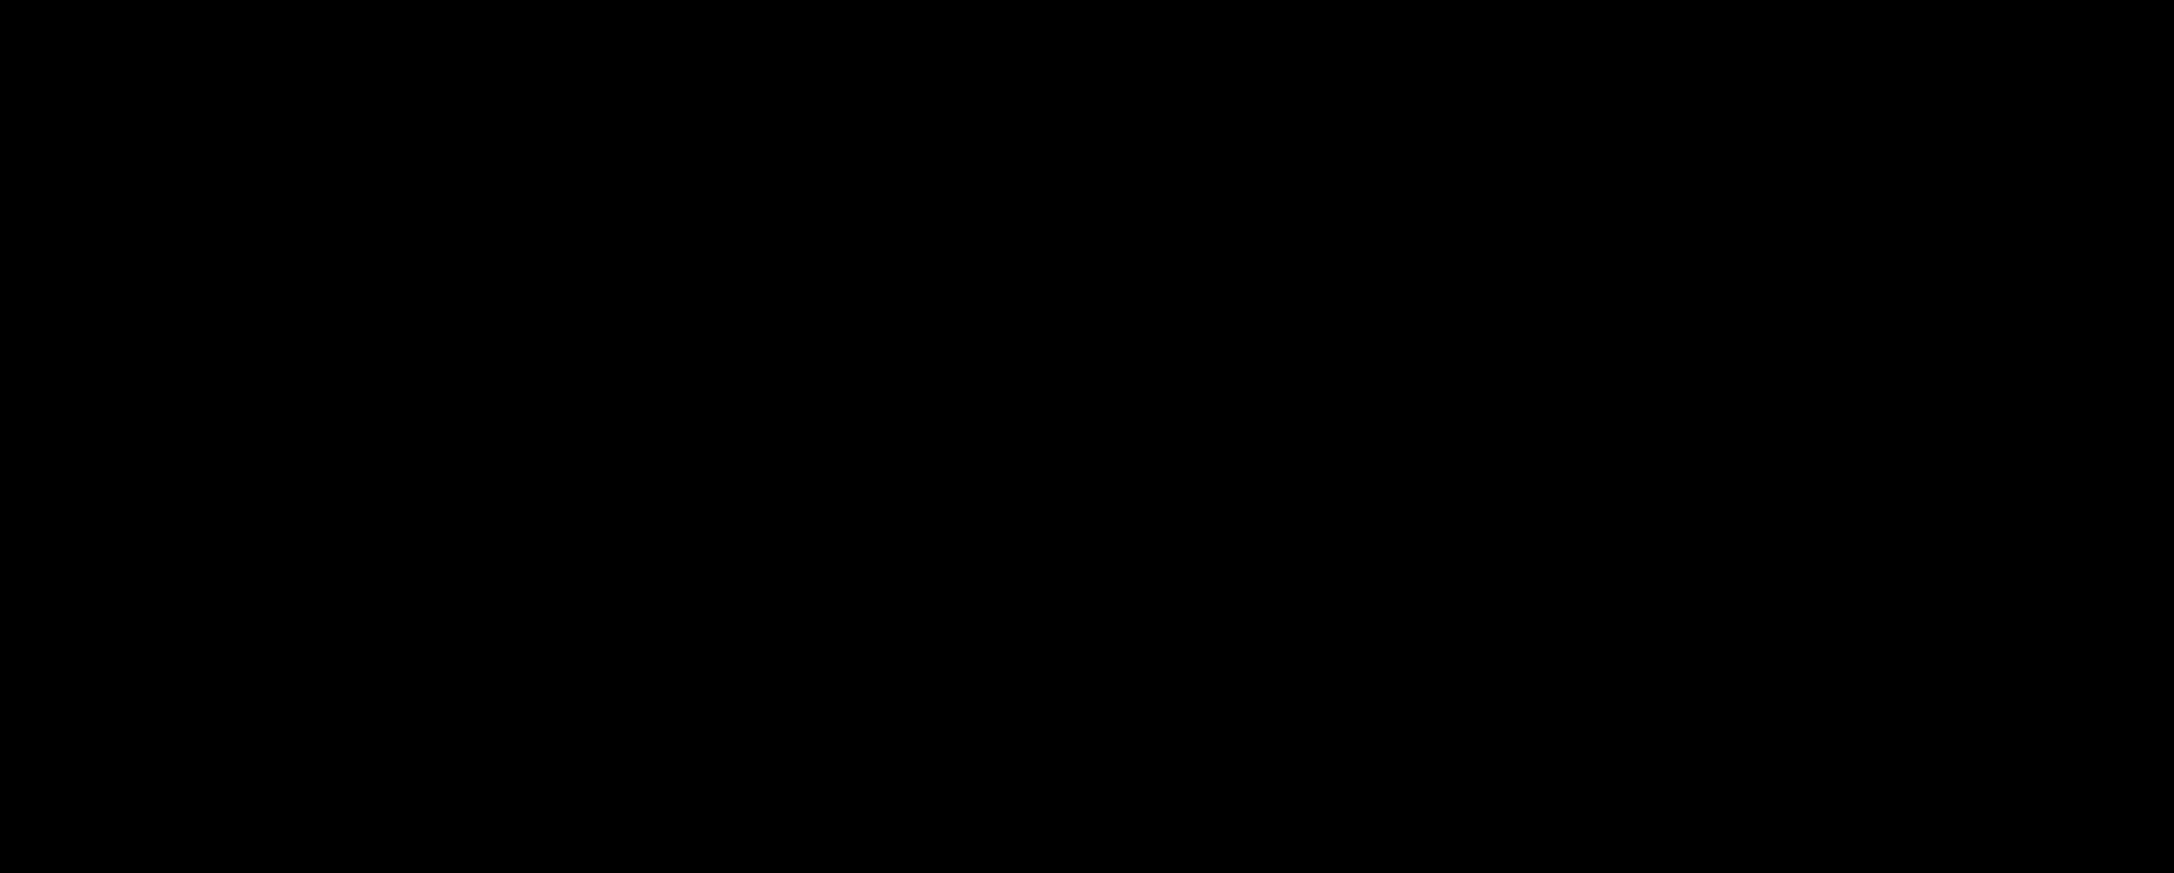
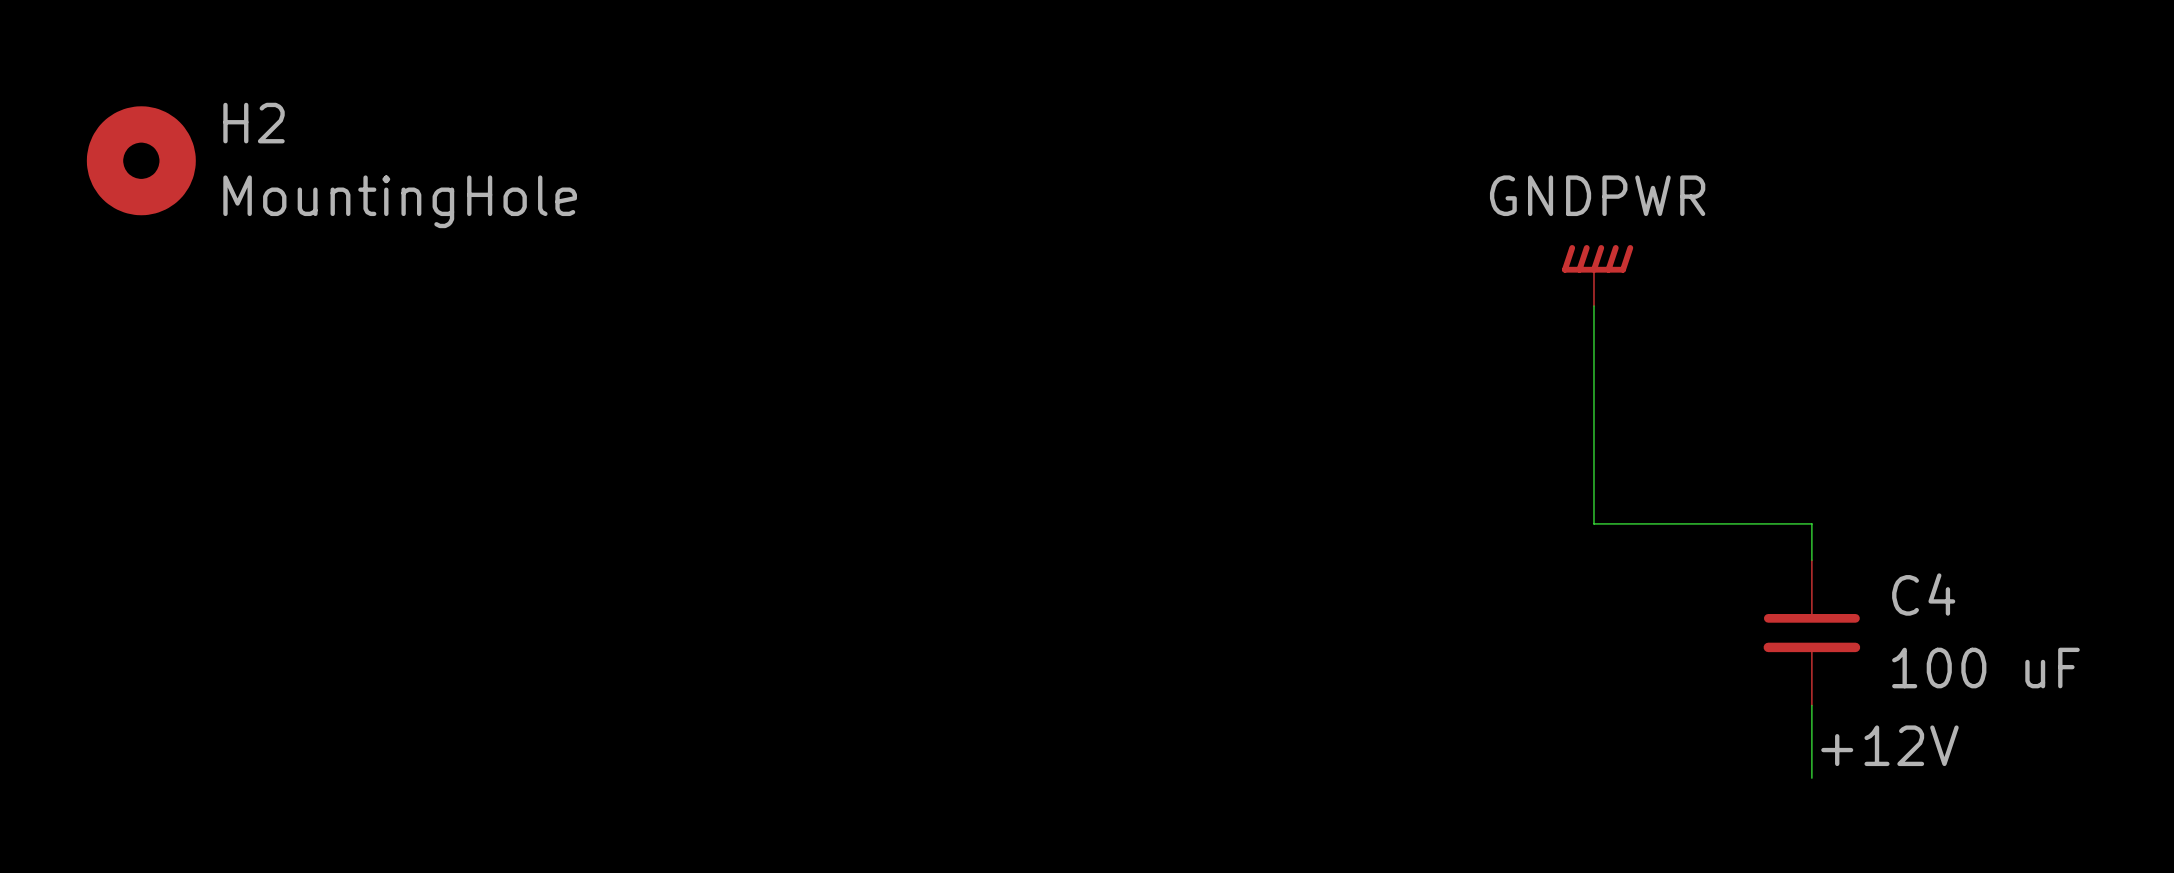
H2: none -> MountingHole (141, 160)
power symbol: none -> GNDPWR (1597, 275)
wire: none -> (1593, 306) (1593, 523) (1811, 523) (1811, 560)
C4: none -> 100 uF (1811, 632)
wire: none -> (1811, 705) (1811, 778)
label: none -> +12V (1889, 745)

